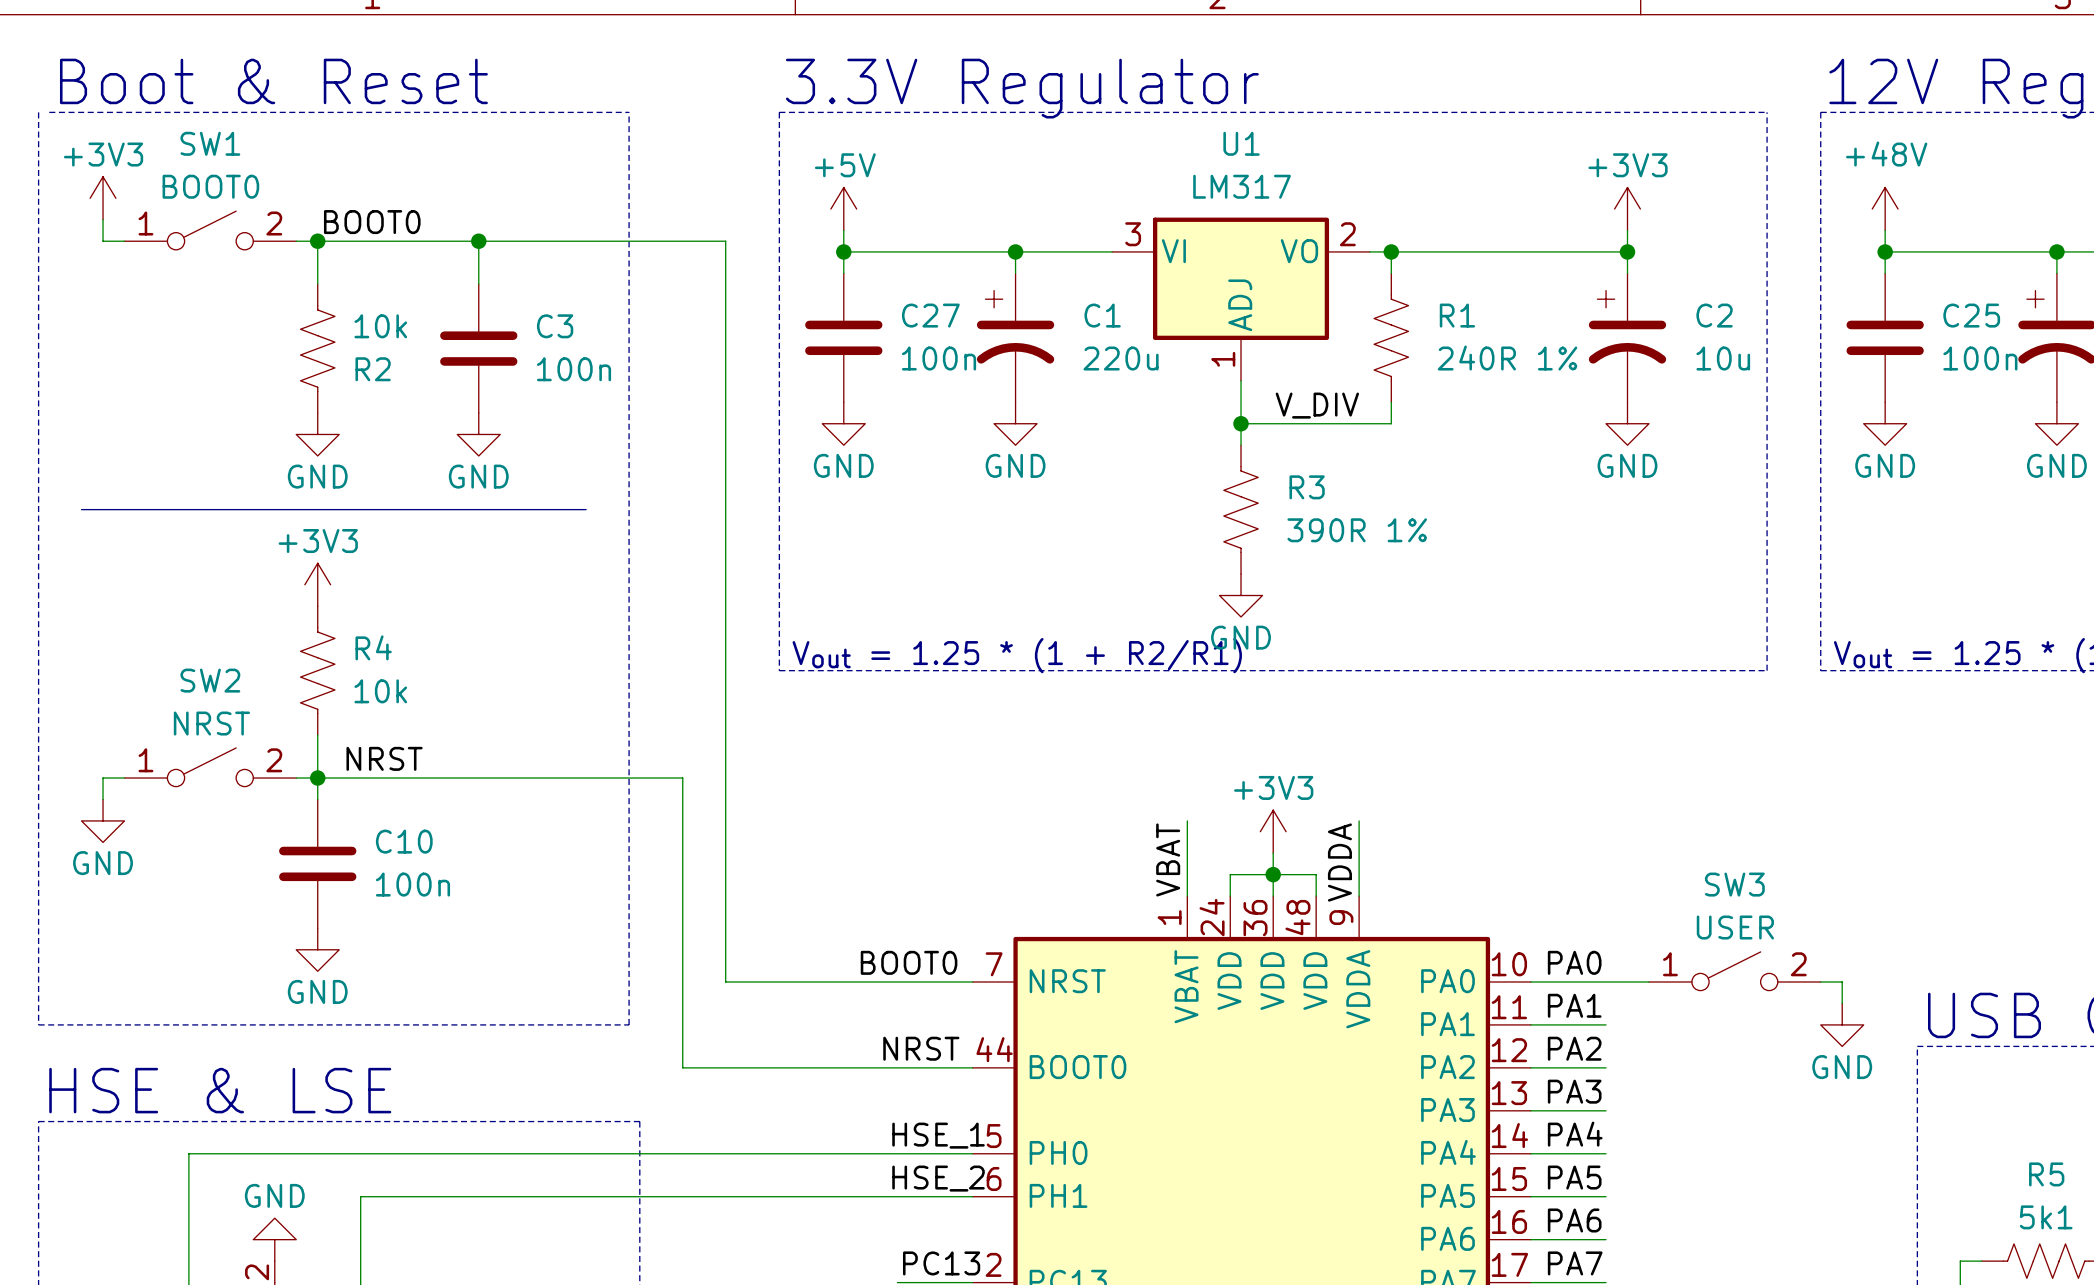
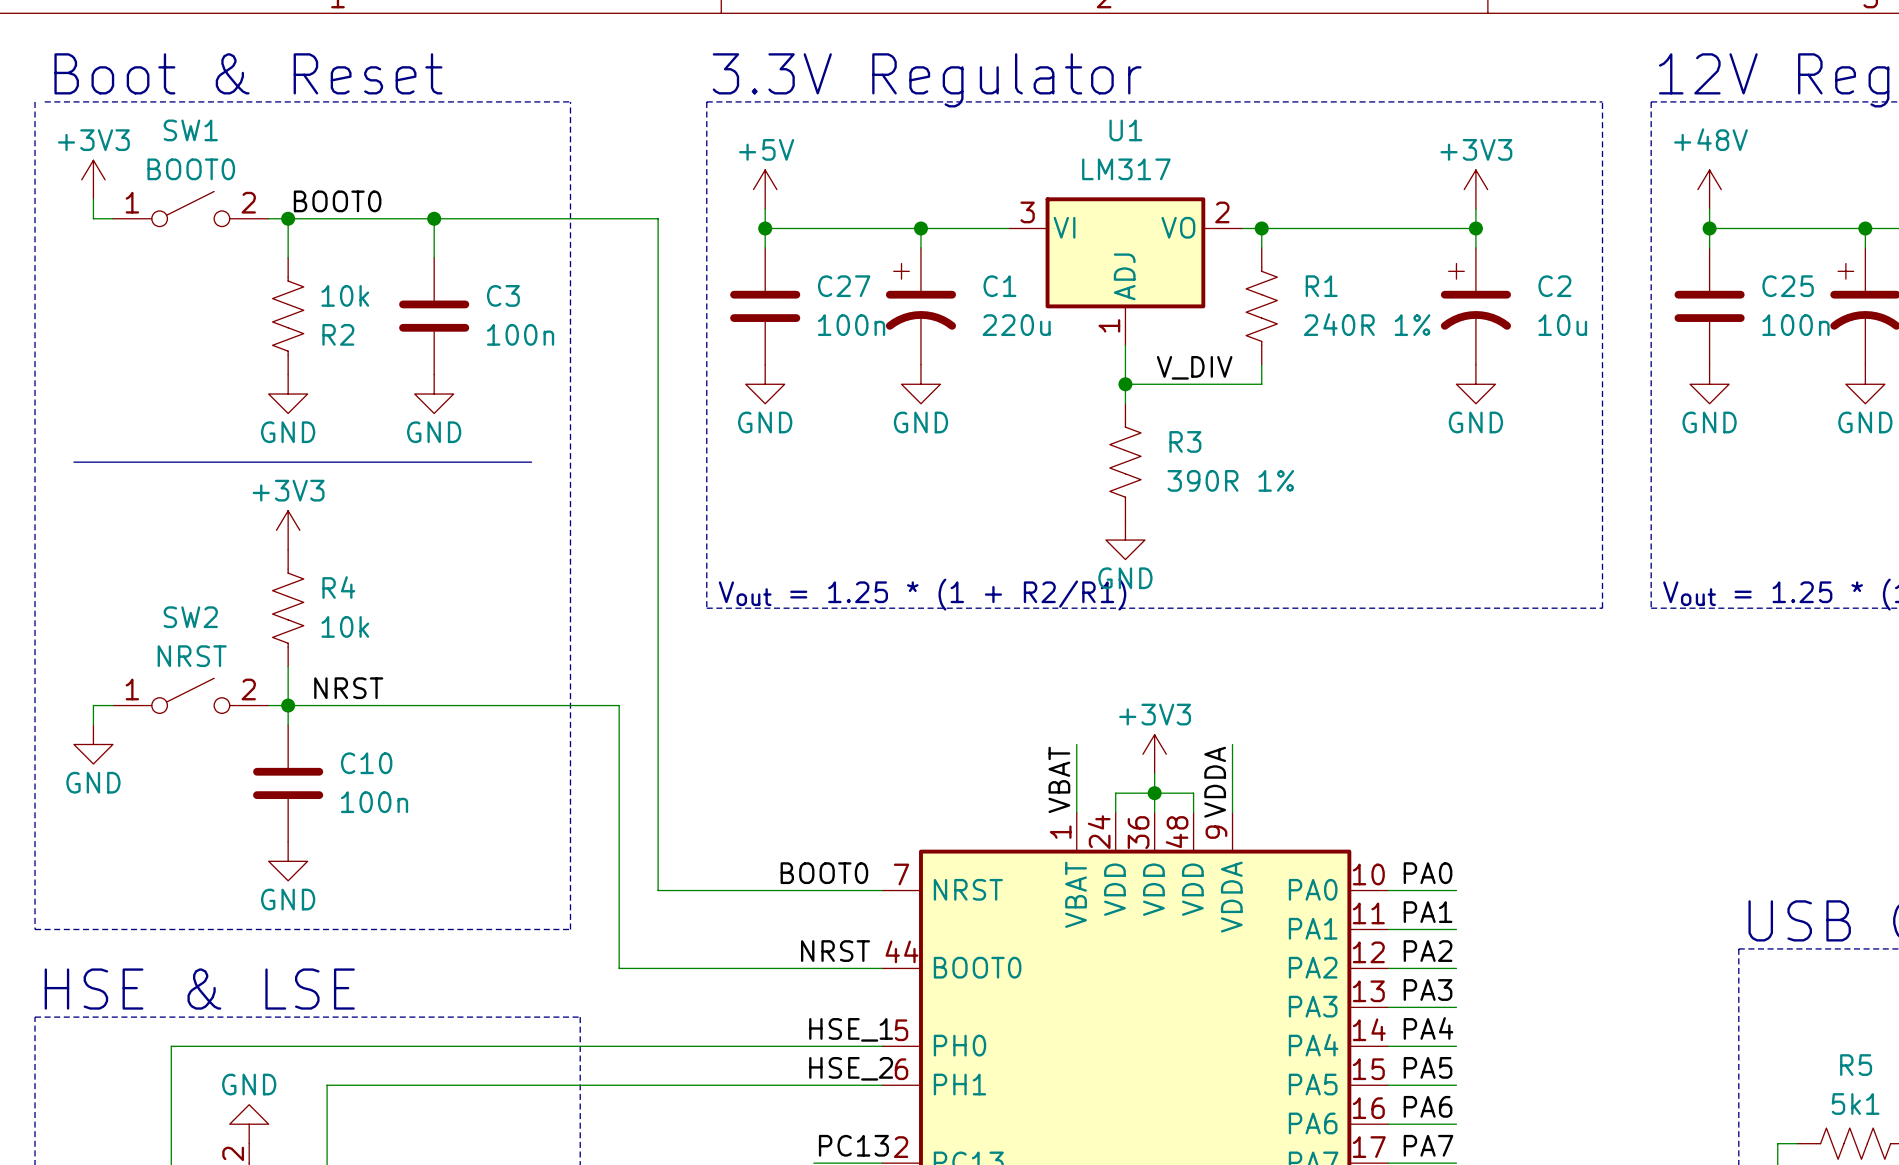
SW3: USER (1734, 971) -> none
wire: (1606, 981) (1648, 981) -> none
wire: (1820, 981) (1842, 981) (1842, 1003) -> none
power symbol: GND (1842, 1024) -> none

